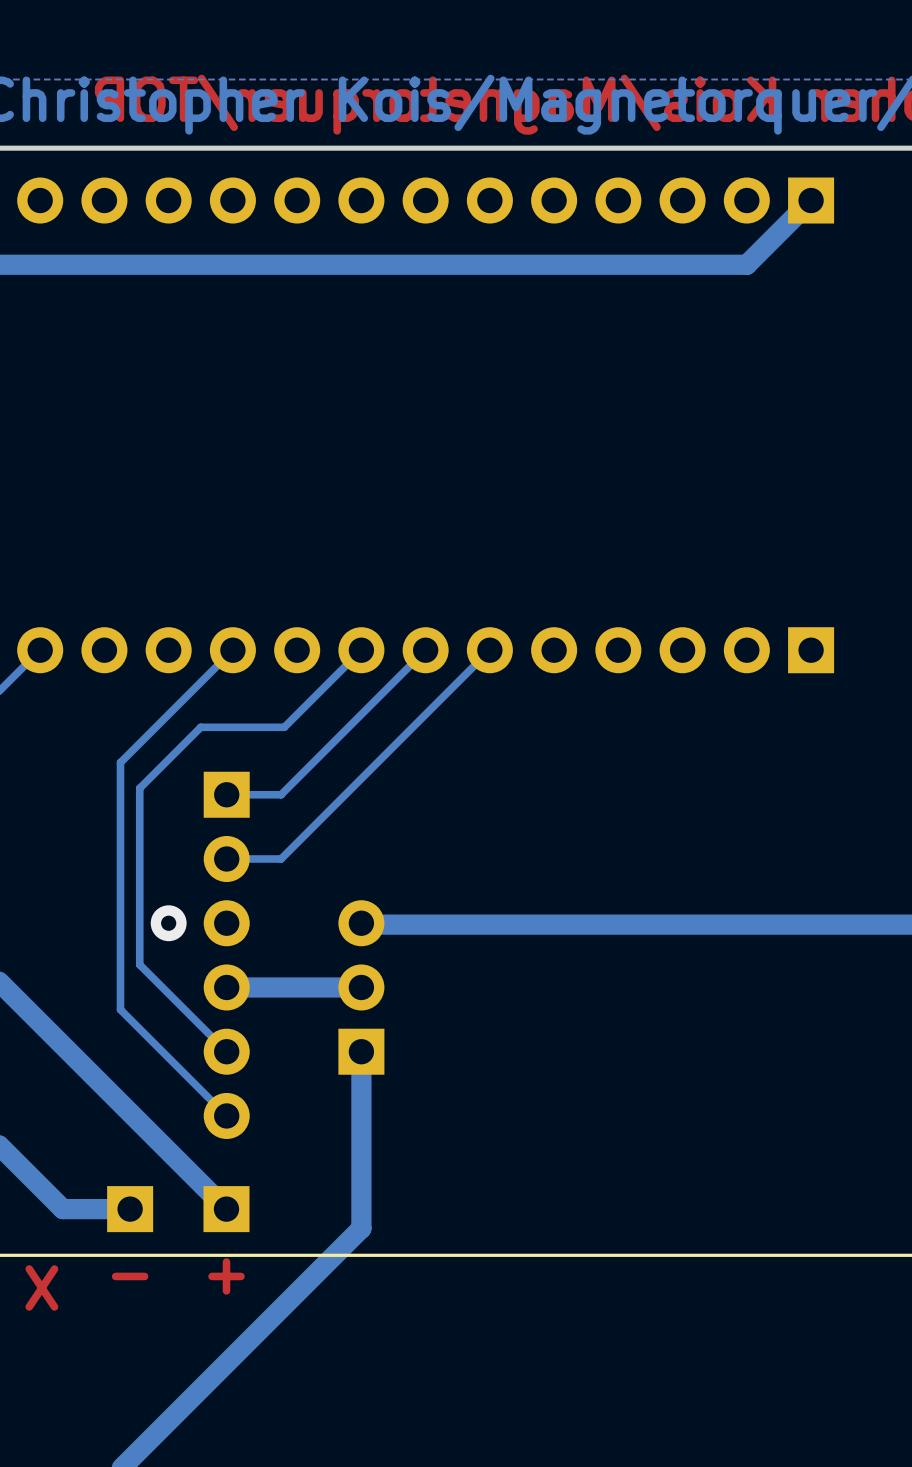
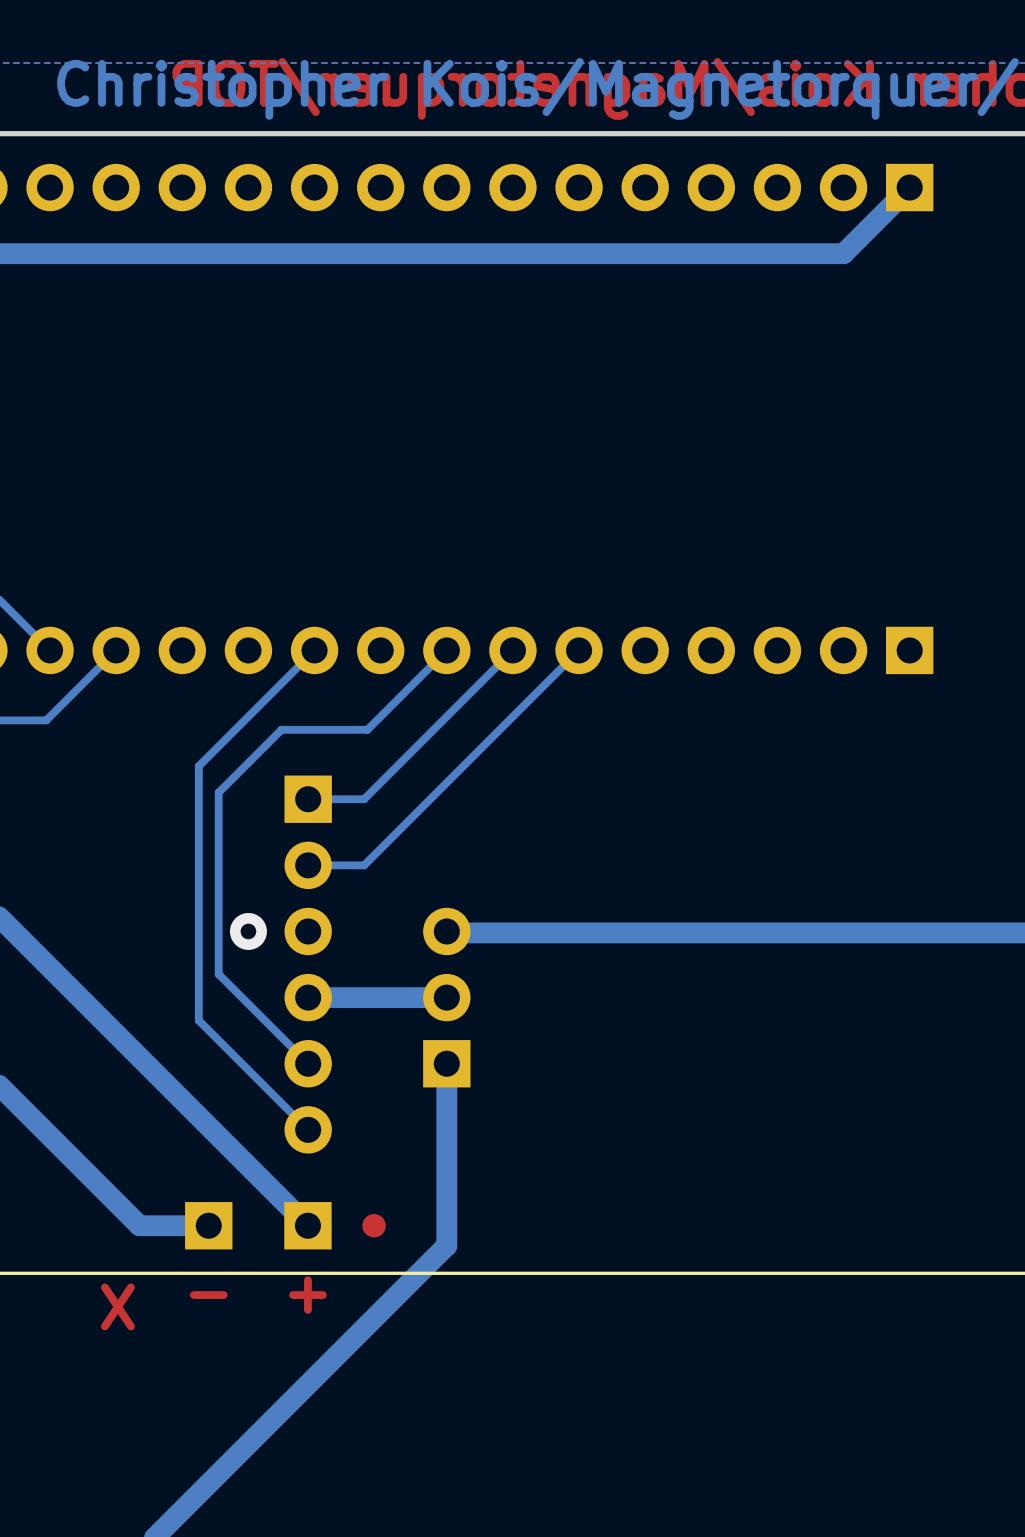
drawing: none -> [362, 1214, 386, 1238]

